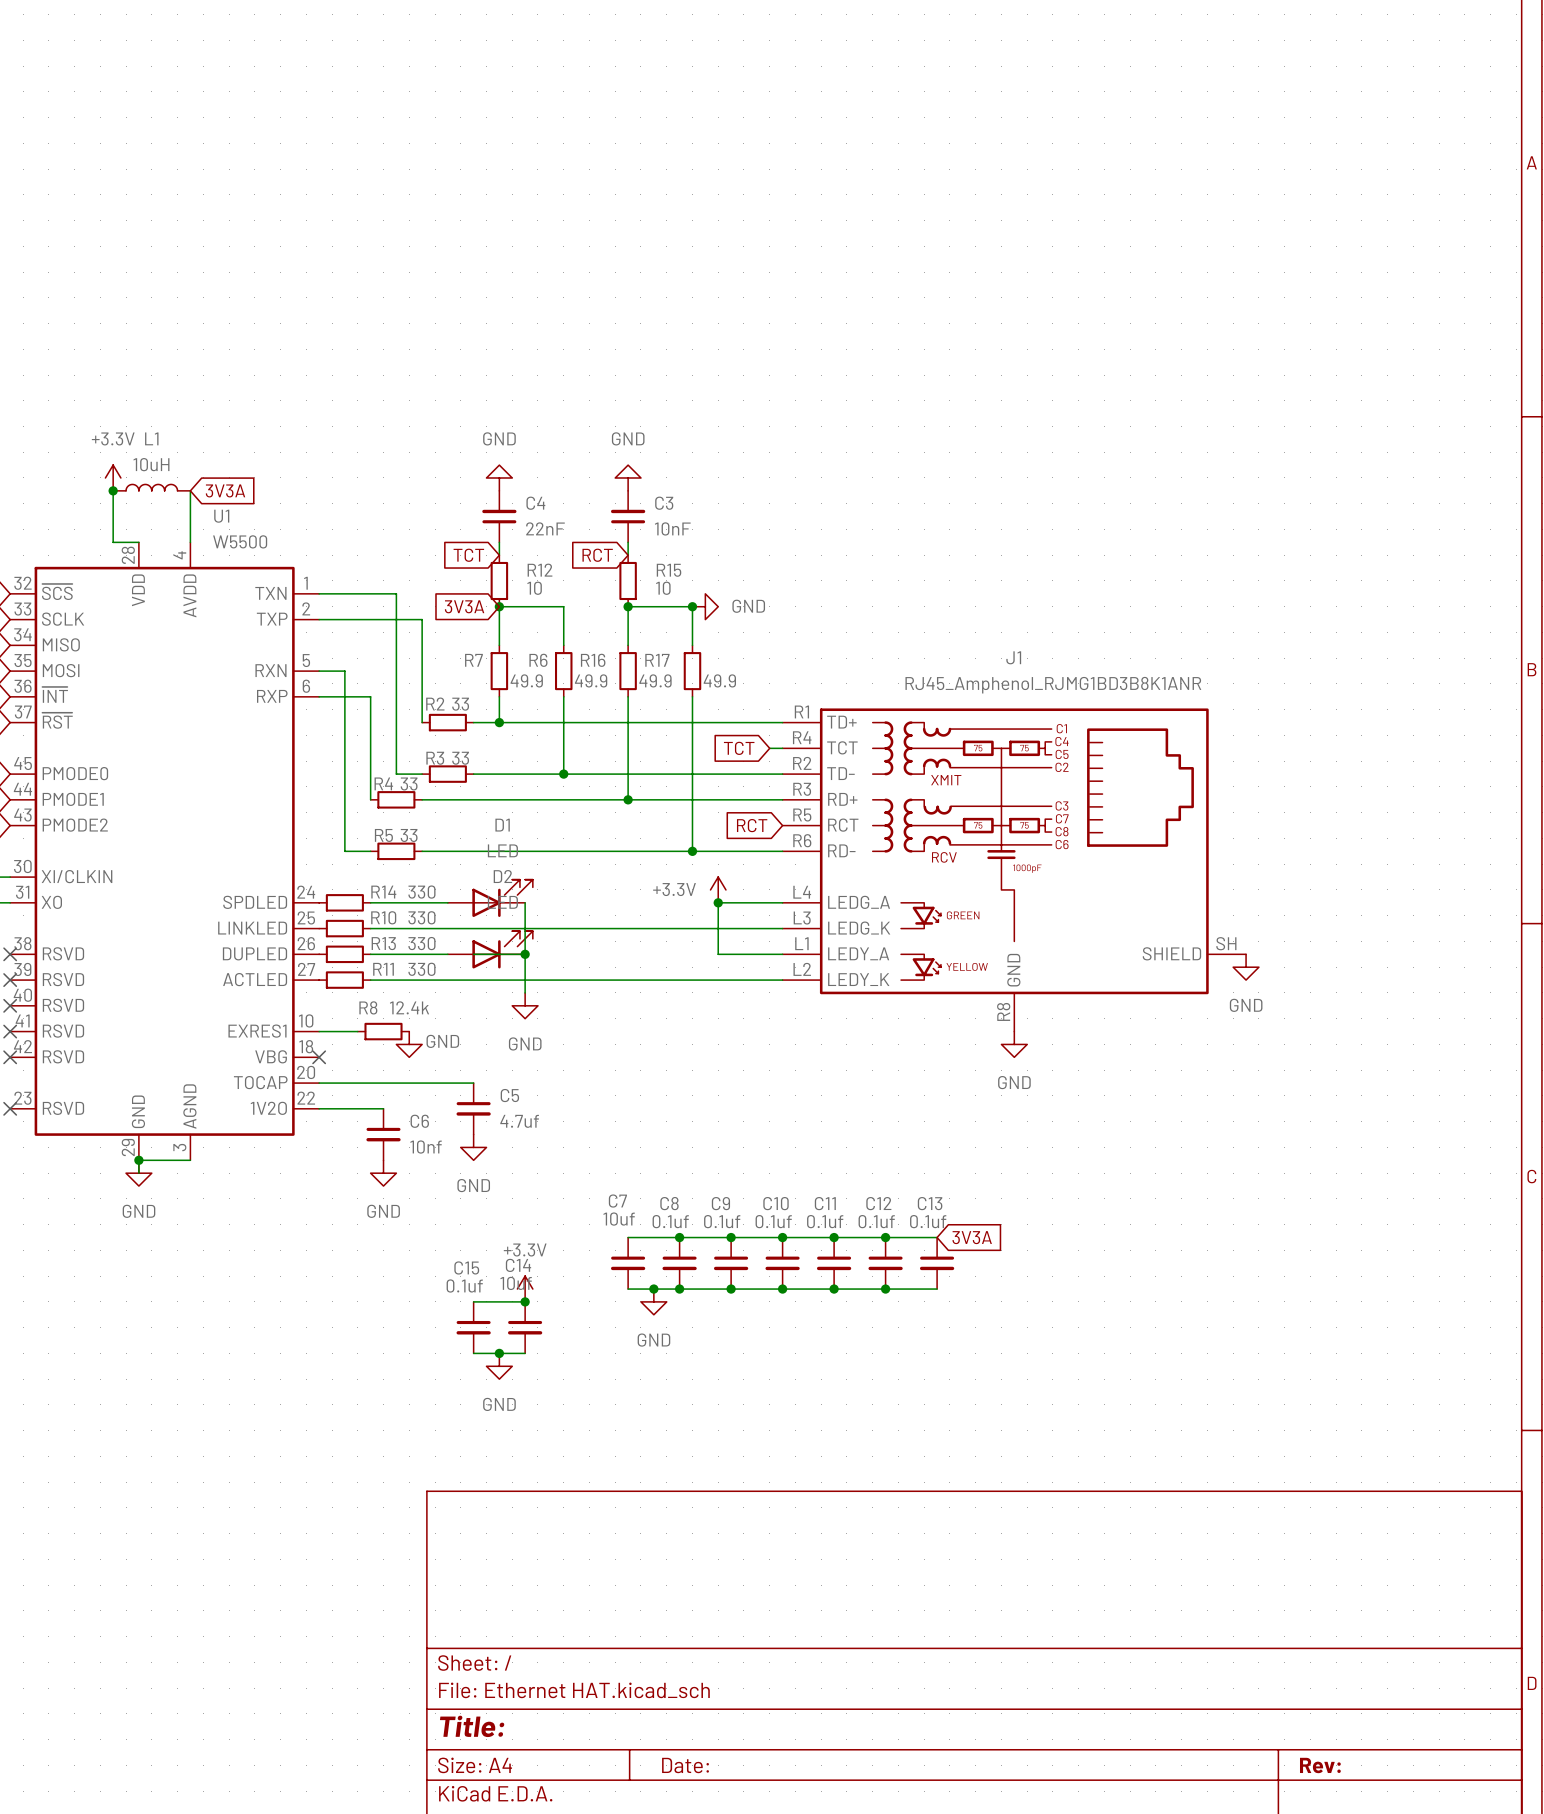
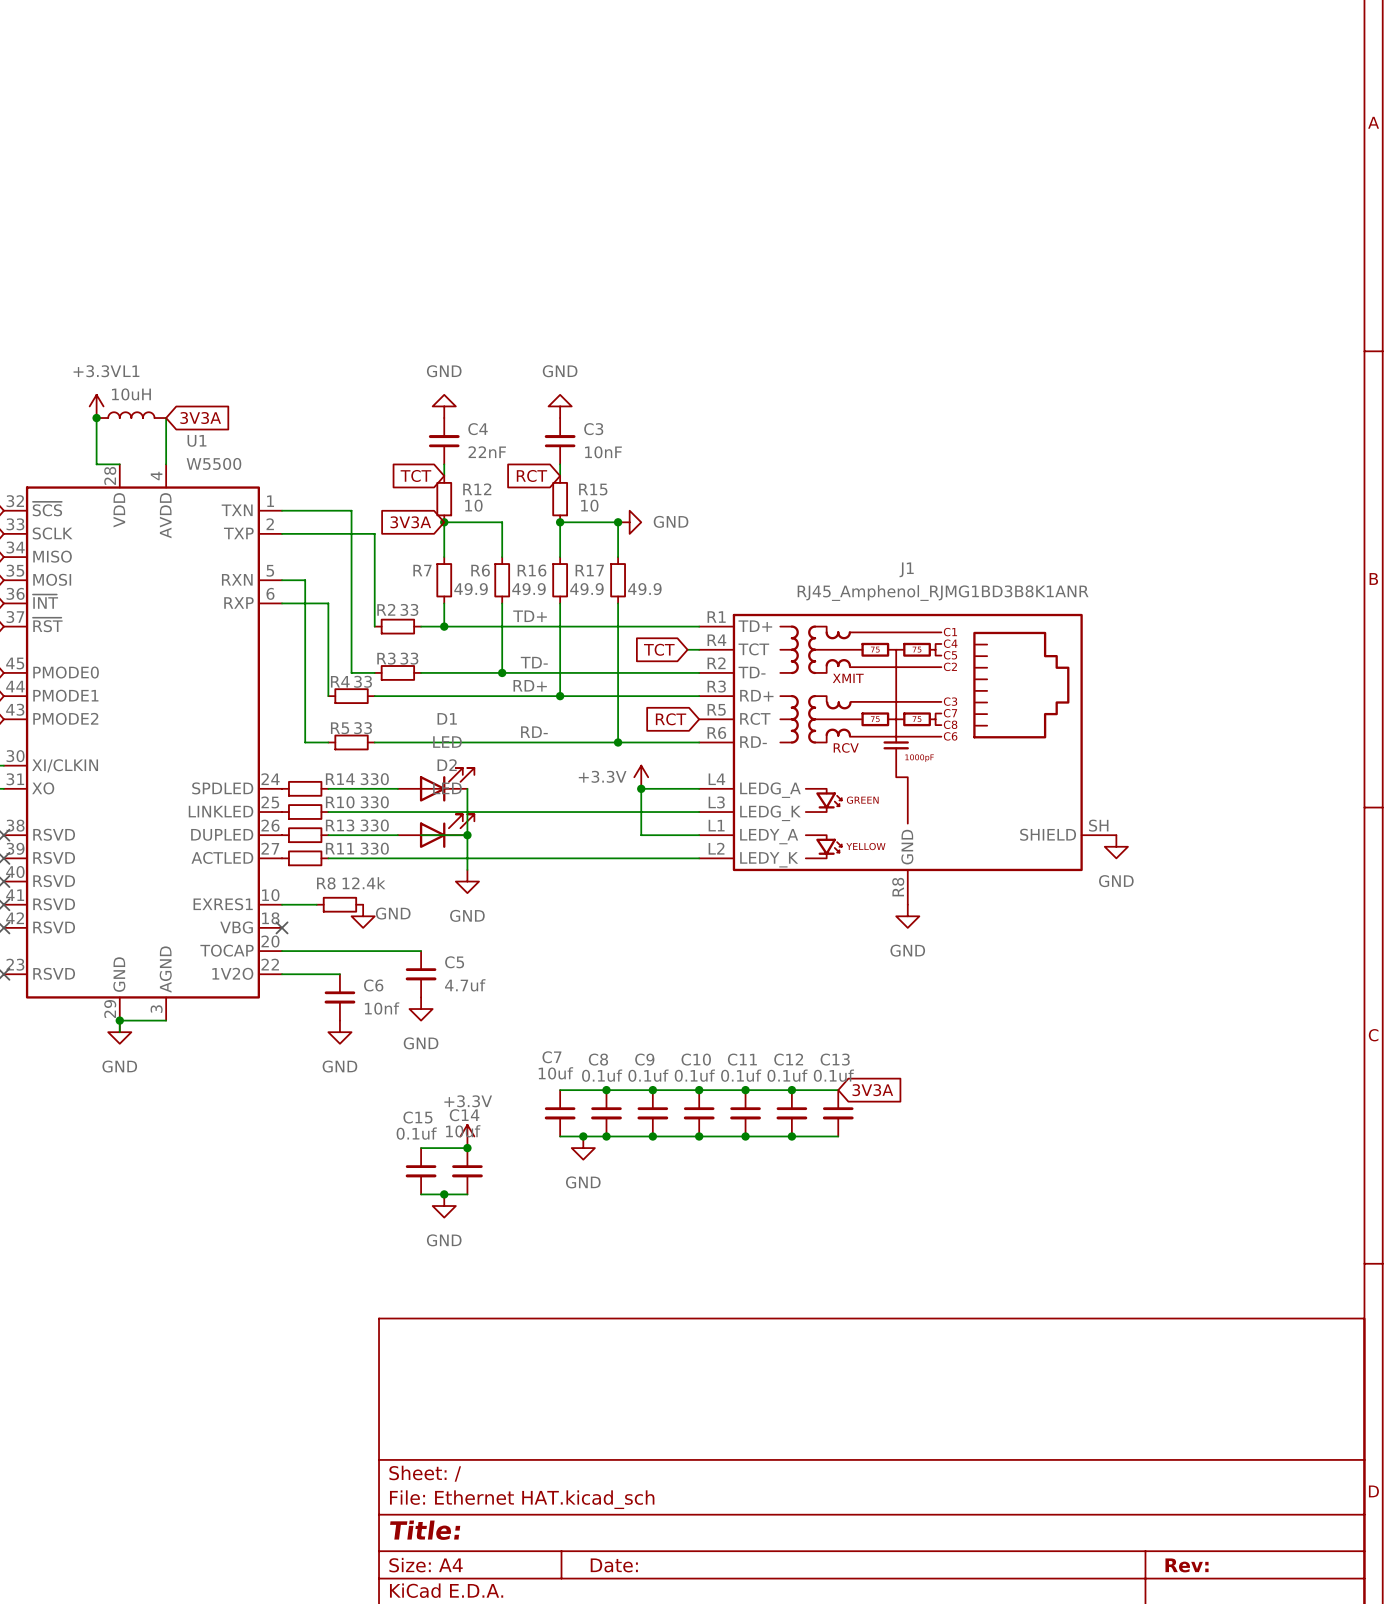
label: none -> TD+ (530, 616)
label: none -> TD- (534, 662)
label: none -> RD+ (530, 685)
label: none -> RD- (534, 732)

